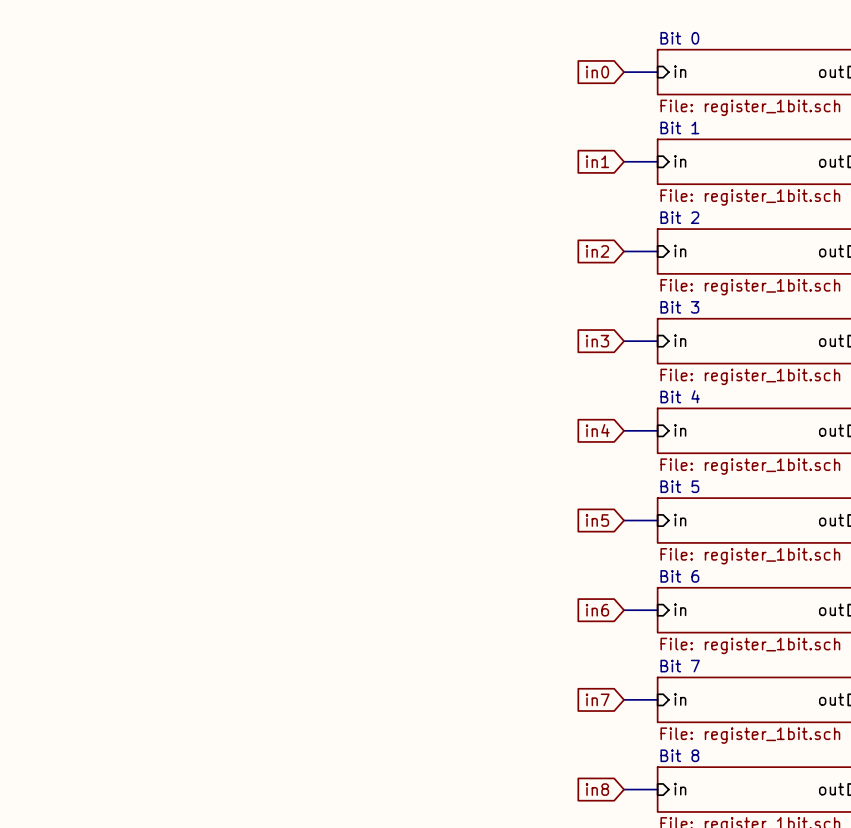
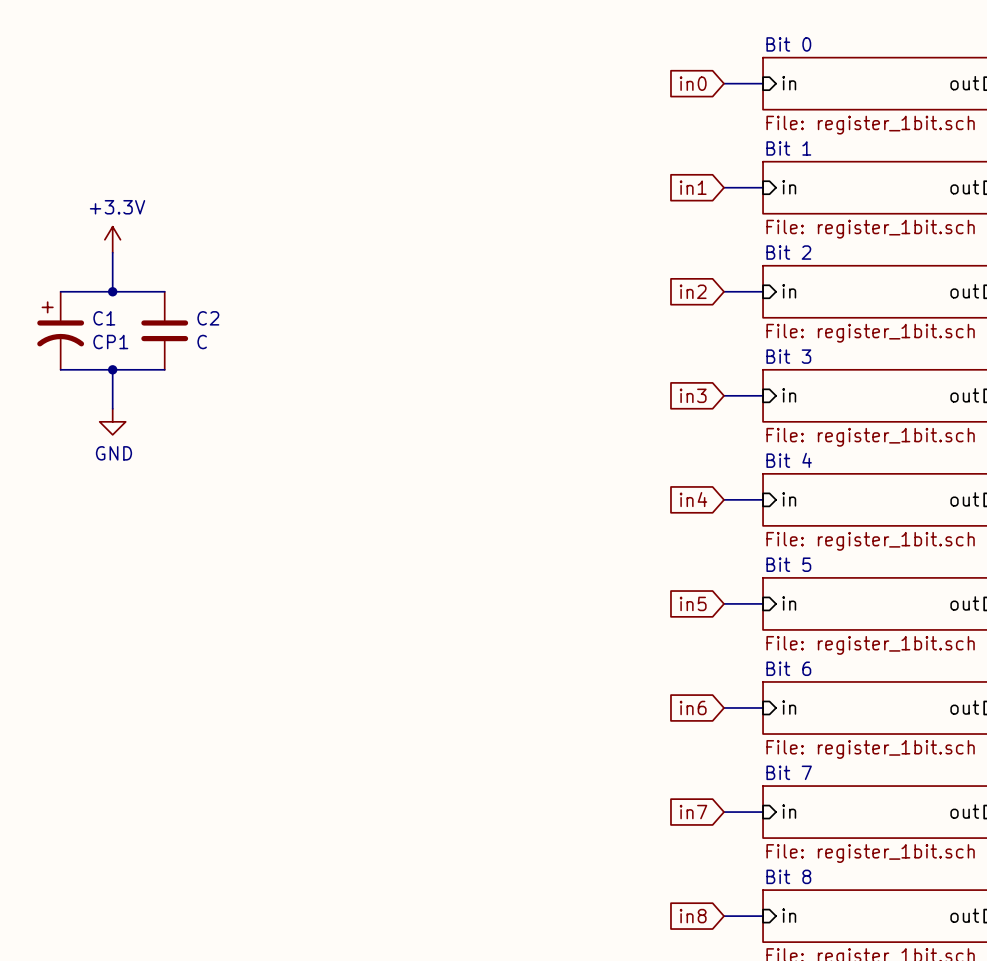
power symbol: none -> +3.3V (112, 239)
wire: none -> (112, 252) (112, 291)
wire: none -> (60, 291) (164, 291)
junction: none -> (112, 291)
C1: none -> CP1 (60, 330)
C2: none -> C (164, 330)
wire: none -> (60, 369) (164, 369)
wire: none -> (112, 369) (112, 408)
junction: none -> (112, 369)
power symbol: none -> GND (112, 421)

